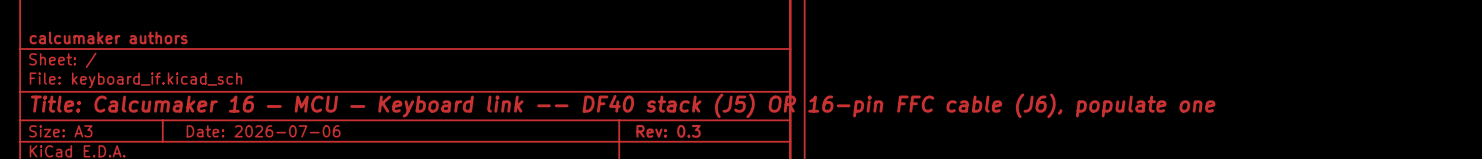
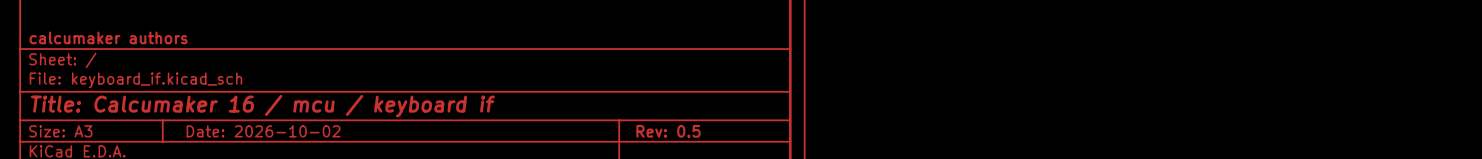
title block: Title: Calcumaker 16 — MCU — Keyboard link -- DF40 stack (J5) OR 16-pin FFC cable (J6), populate one (623, 105) -> Title: Calcumaker 16 / mcu / keyboard if (262, 106)
title block: Date: 2026-07-06 (263, 131) -> Date: 2026-10-02 (263, 131)
title block: Rev: 0.3 (668, 131) -> Rev: 0.5 (668, 131)

